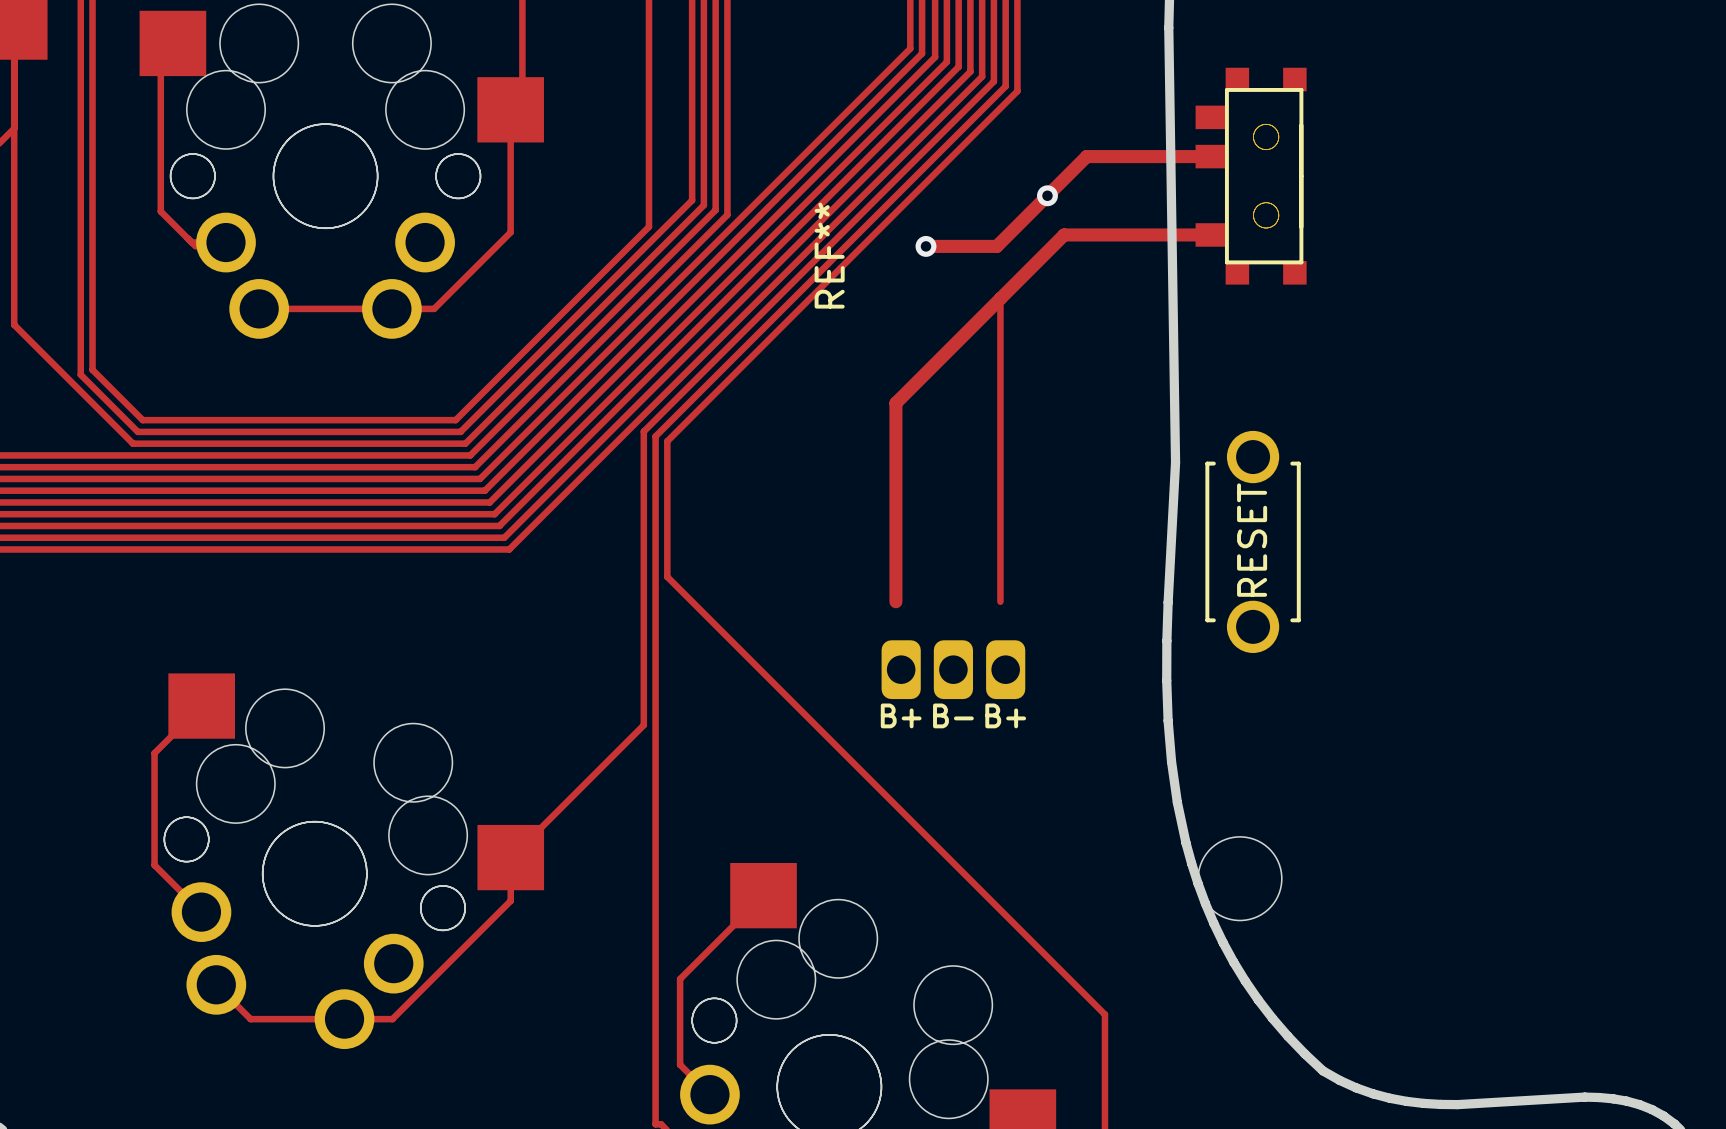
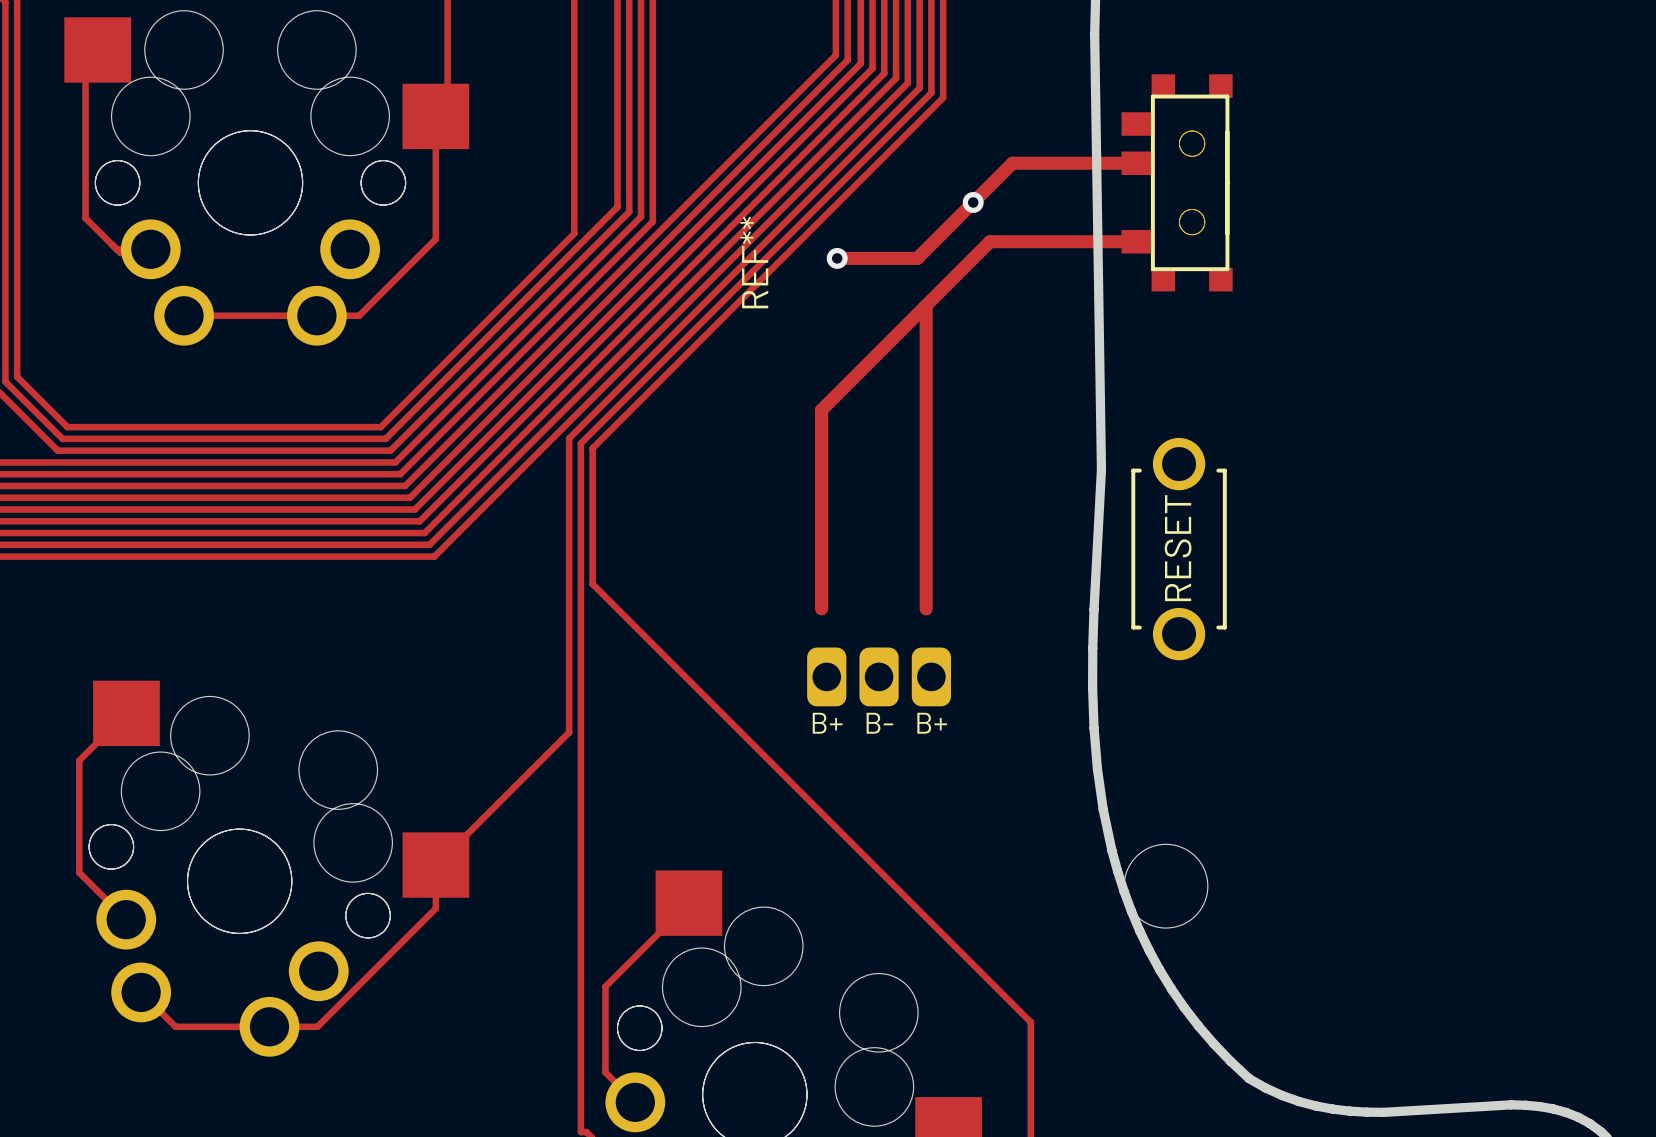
track: (926, 246) (996, 246) -> (837, 258) (917, 258) (922, 253)
via position: (926, 246) -> (837, 258)
track width: thin (1000, 298) (1000, 601) -> thick (926, 305) (926, 608)

